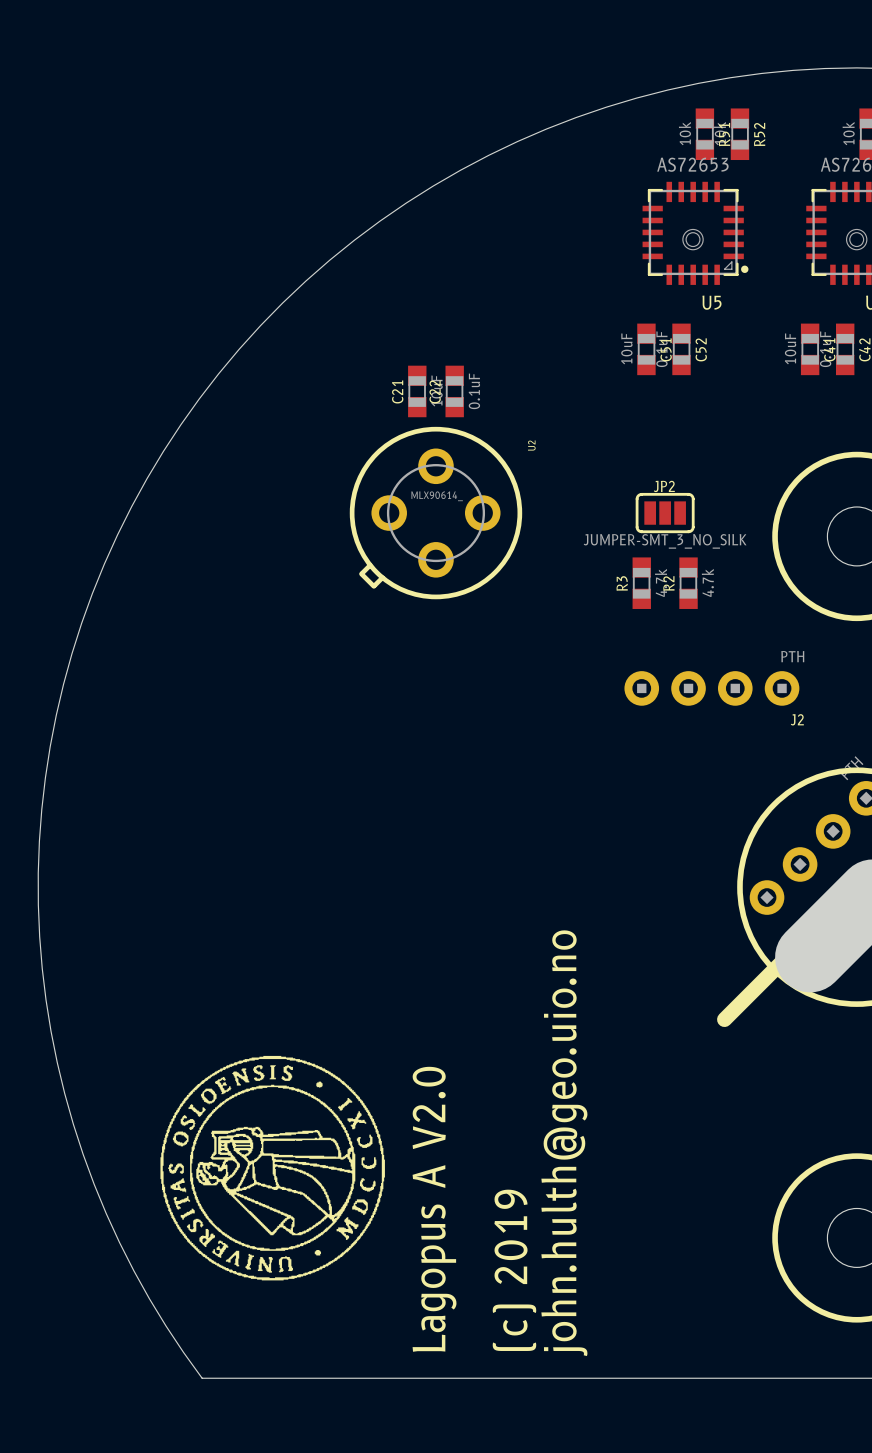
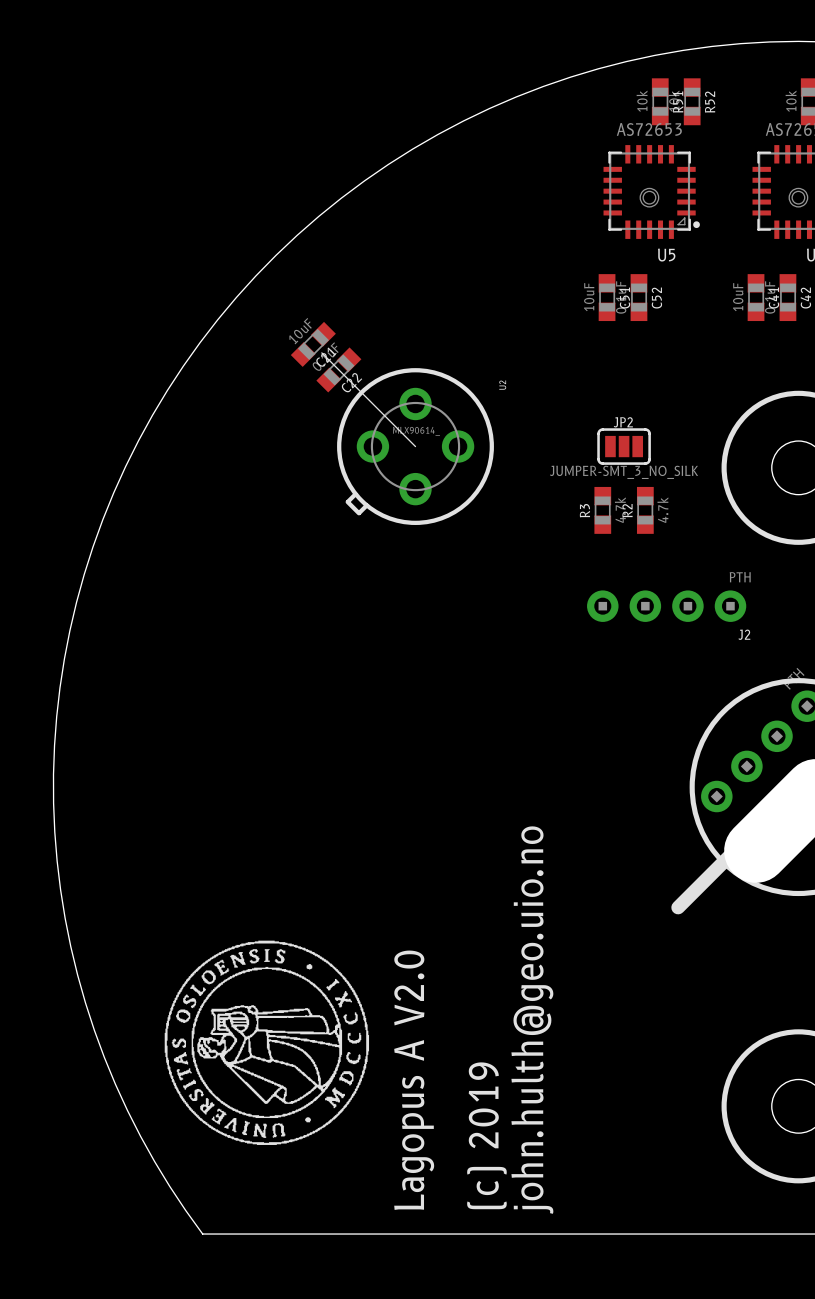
C21 rotation: 0° (417, 391) -> 45° clockwise (313, 344)
C21 position: (417, 391) -> (313, 344)
C22 rotation: 0° (454, 391) -> 45° clockwise (338, 369)
C22 position: (454, 391) -> (338, 369)
line: none -> (321, 352) (415, 446)

